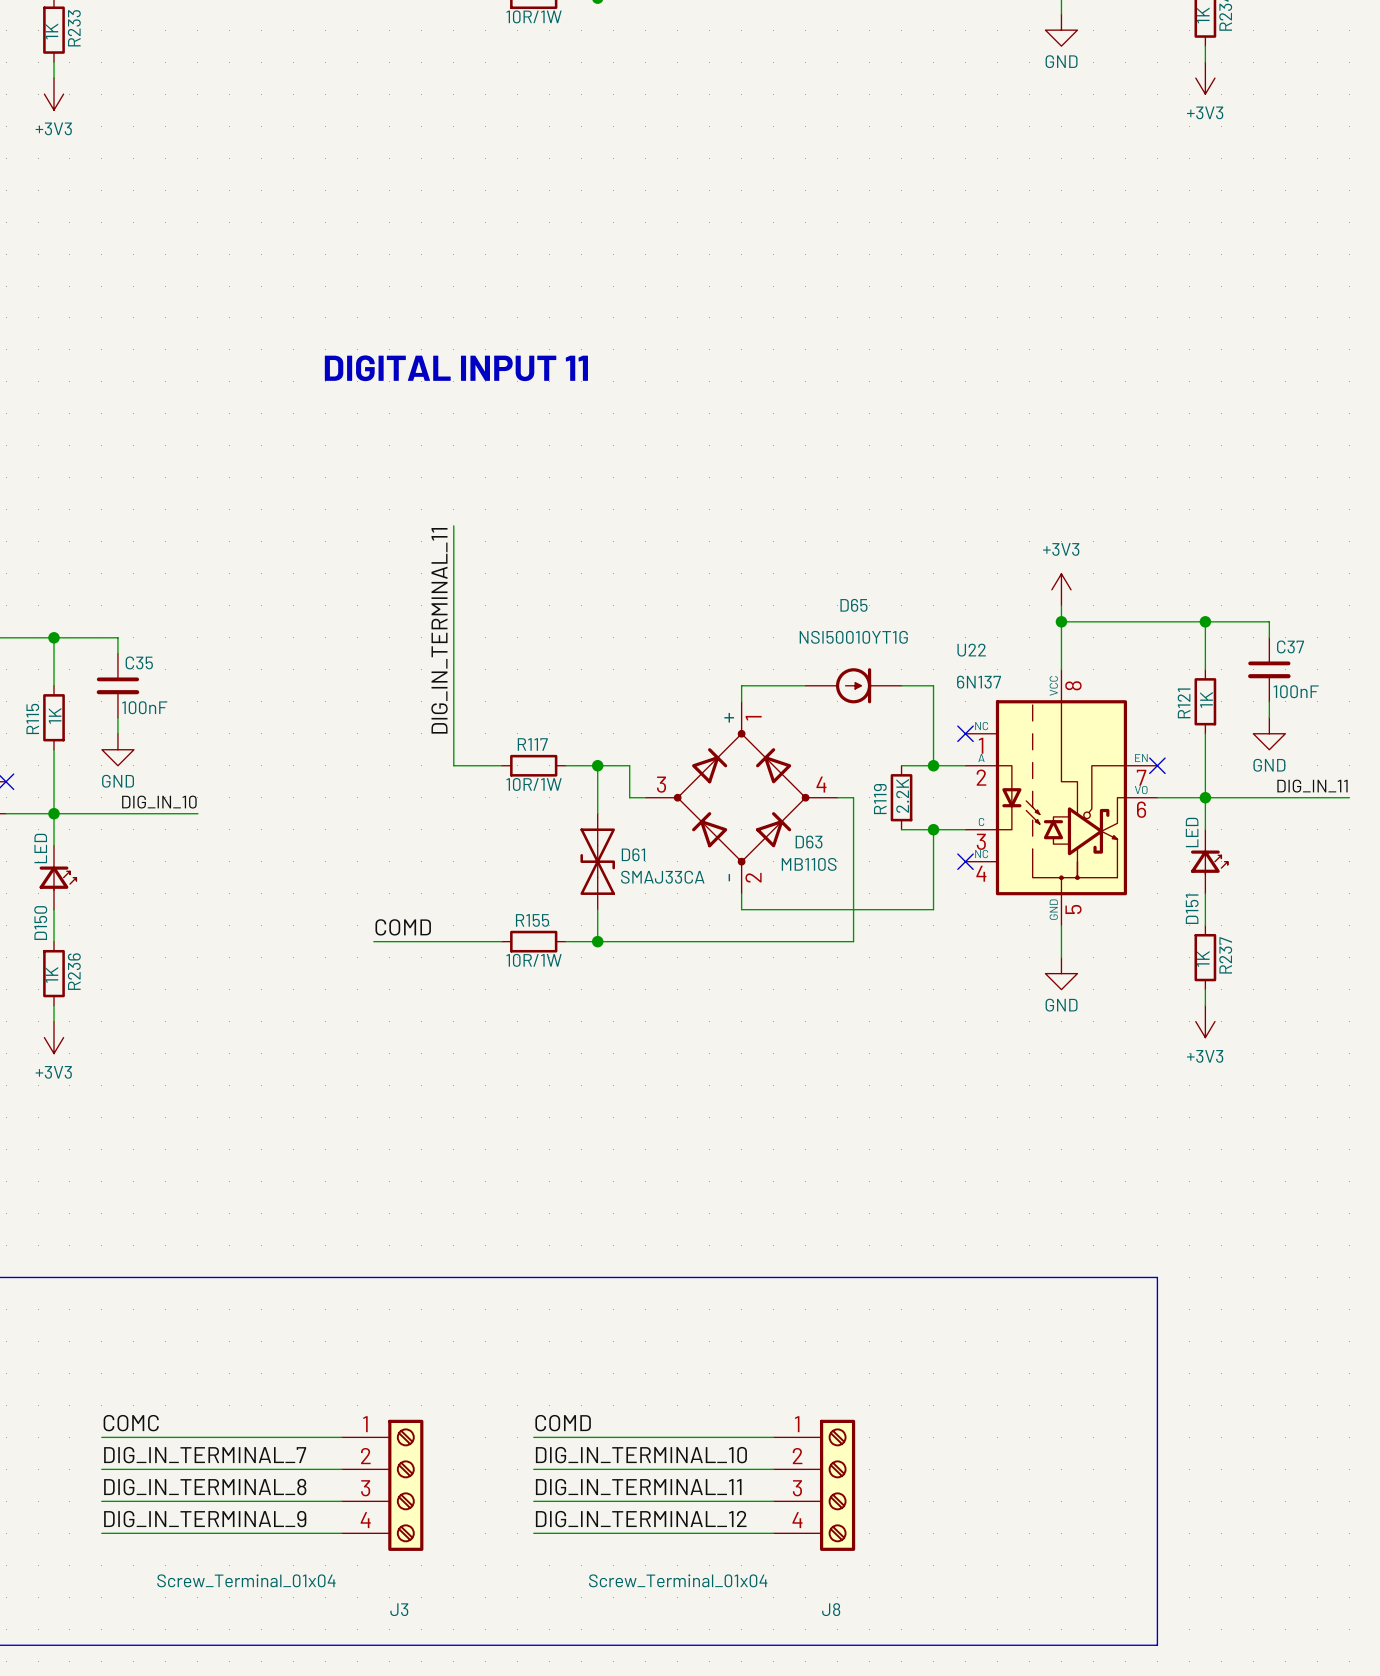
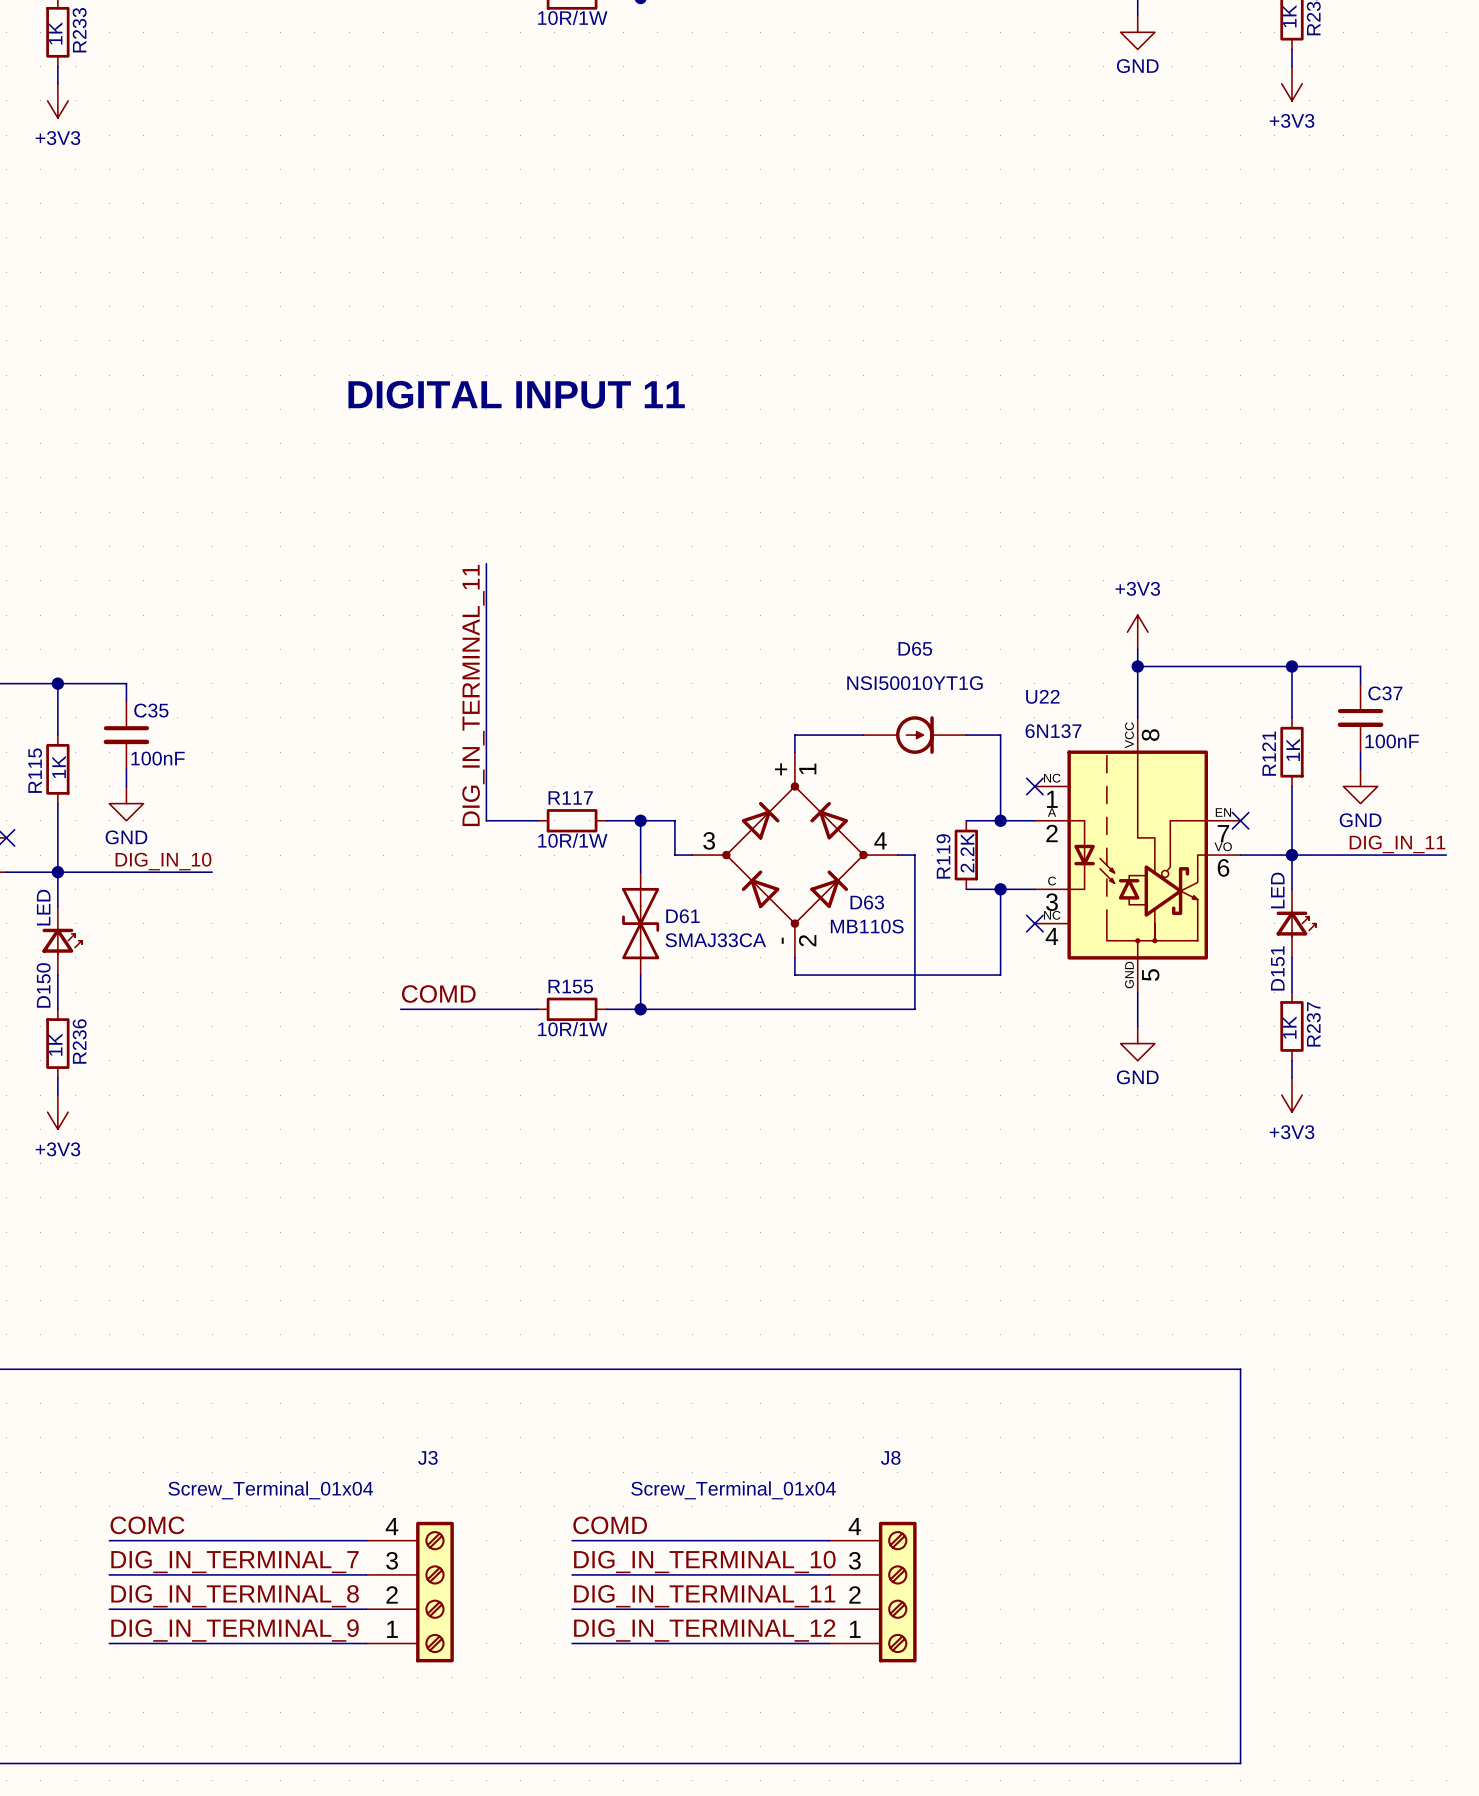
J3 flip: as is (405, 1485) -> up-down (434, 1592)
J8 flip: as is (837, 1485) -> up-down (897, 1592)

